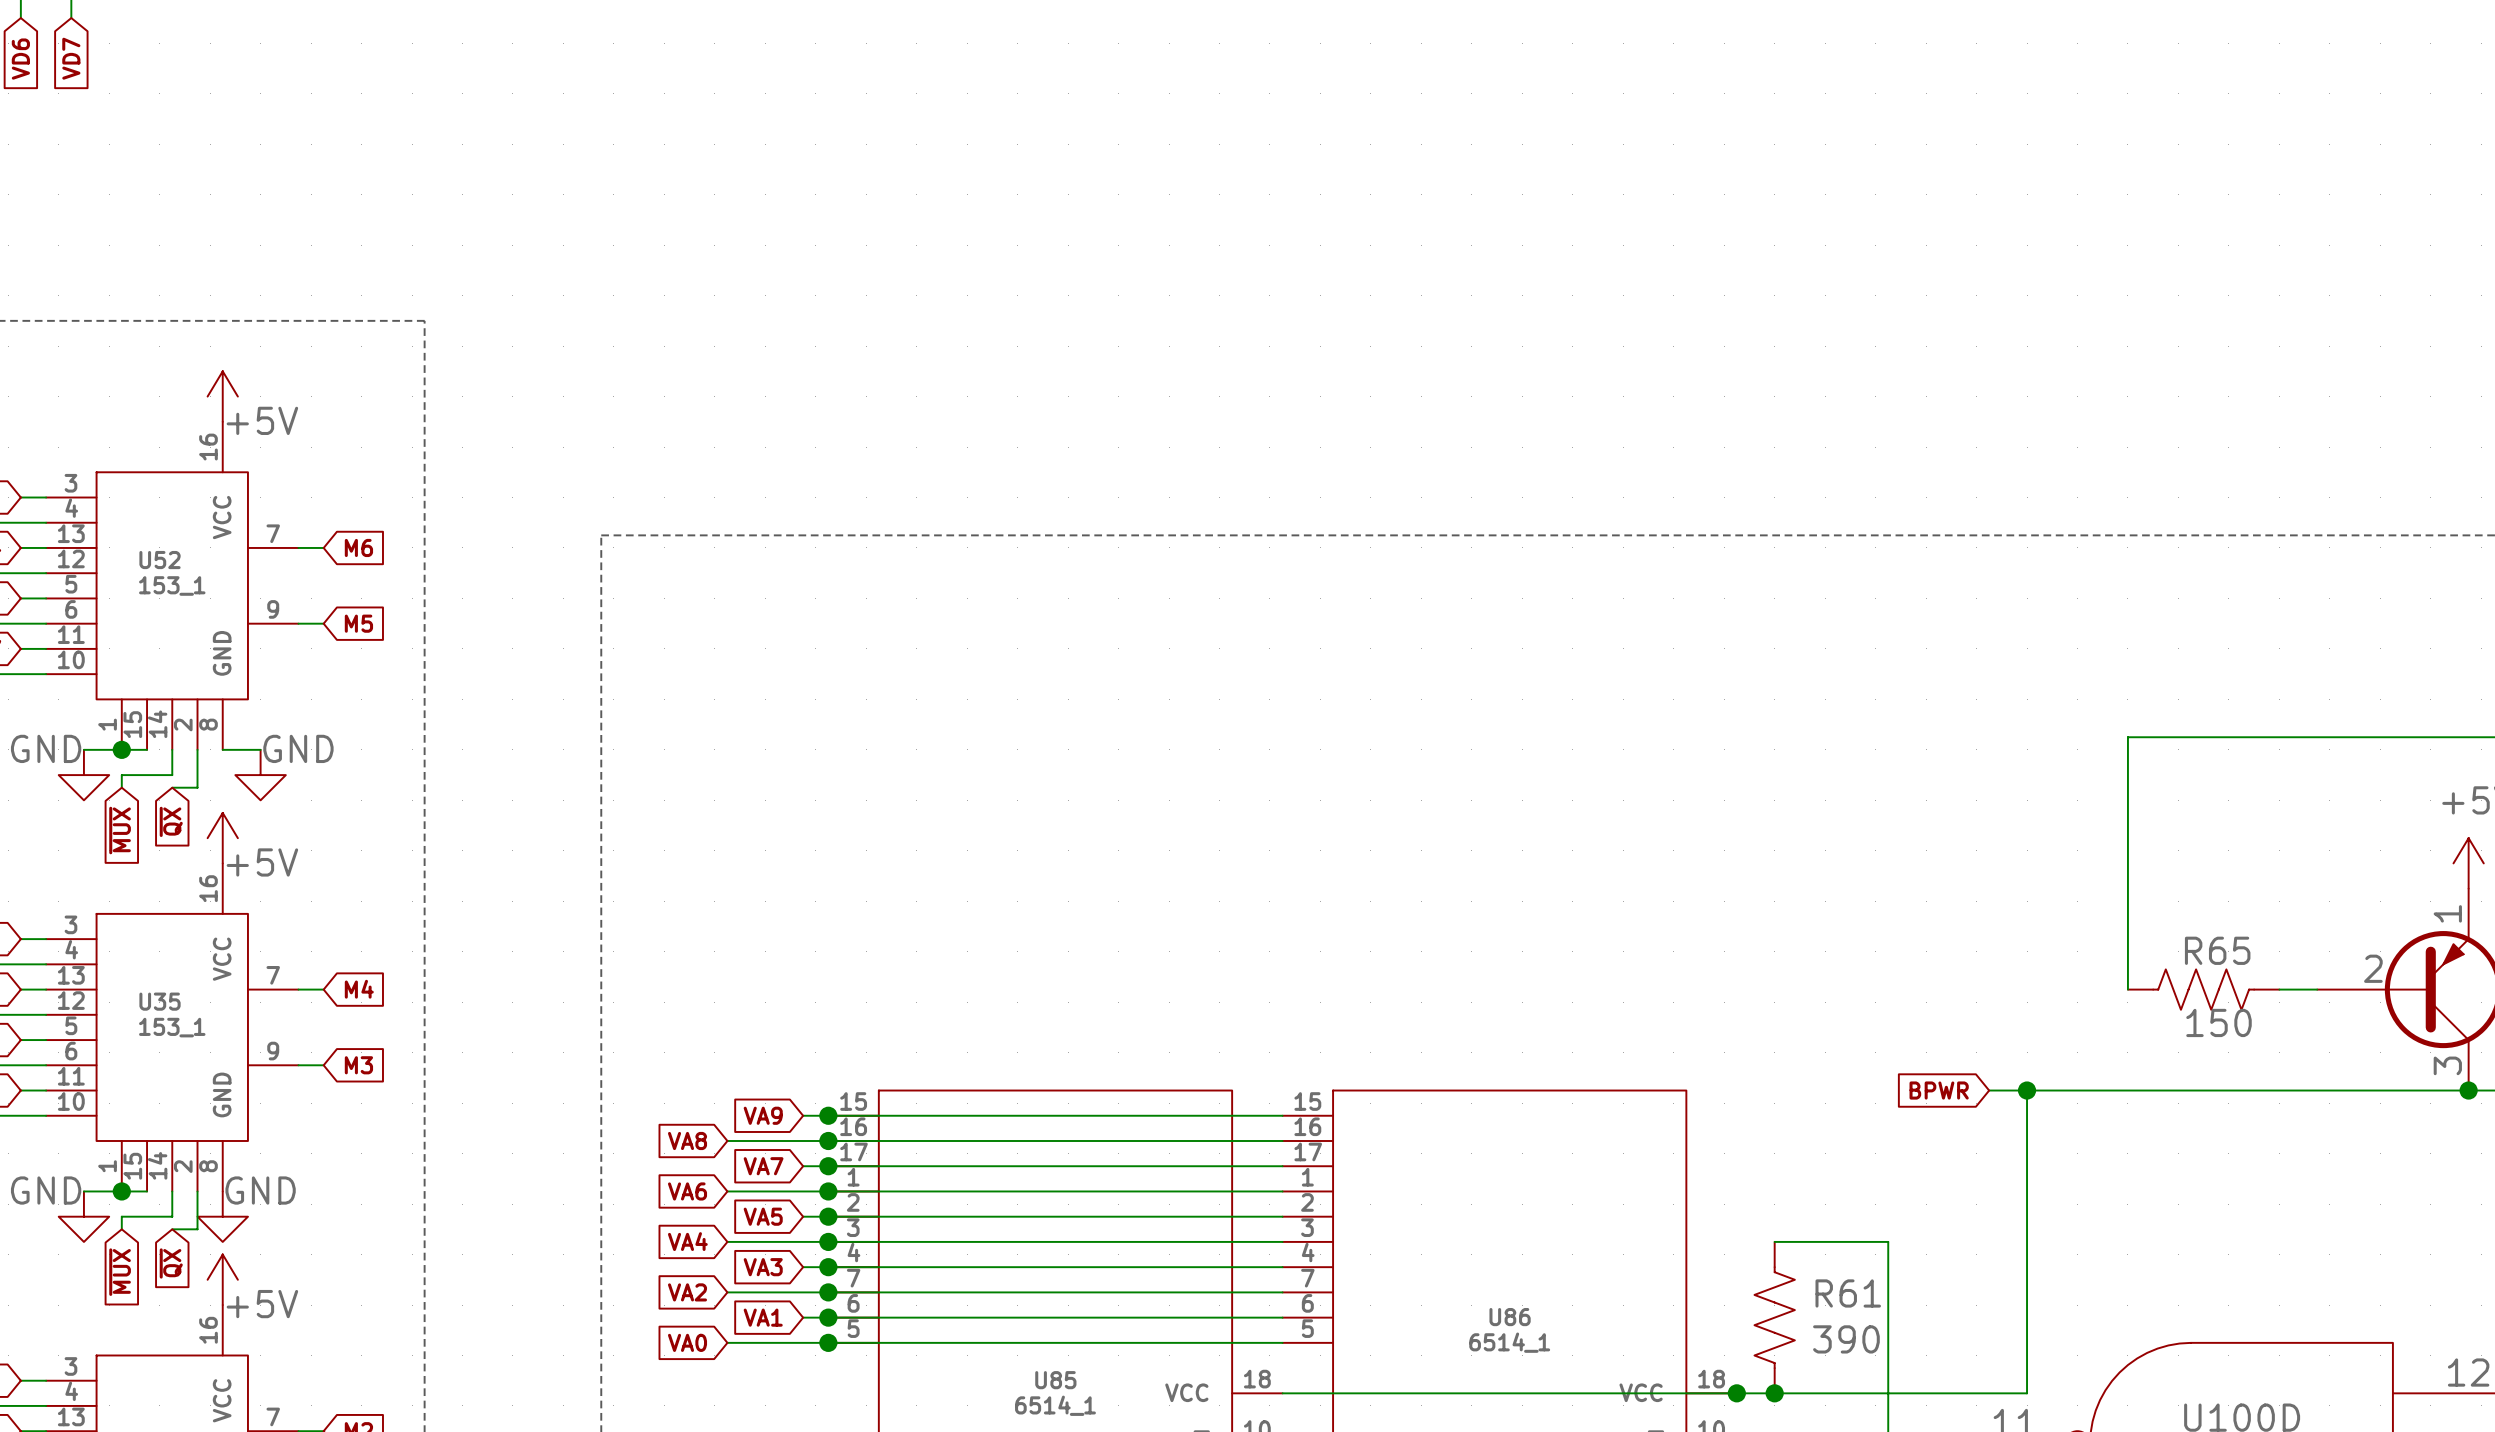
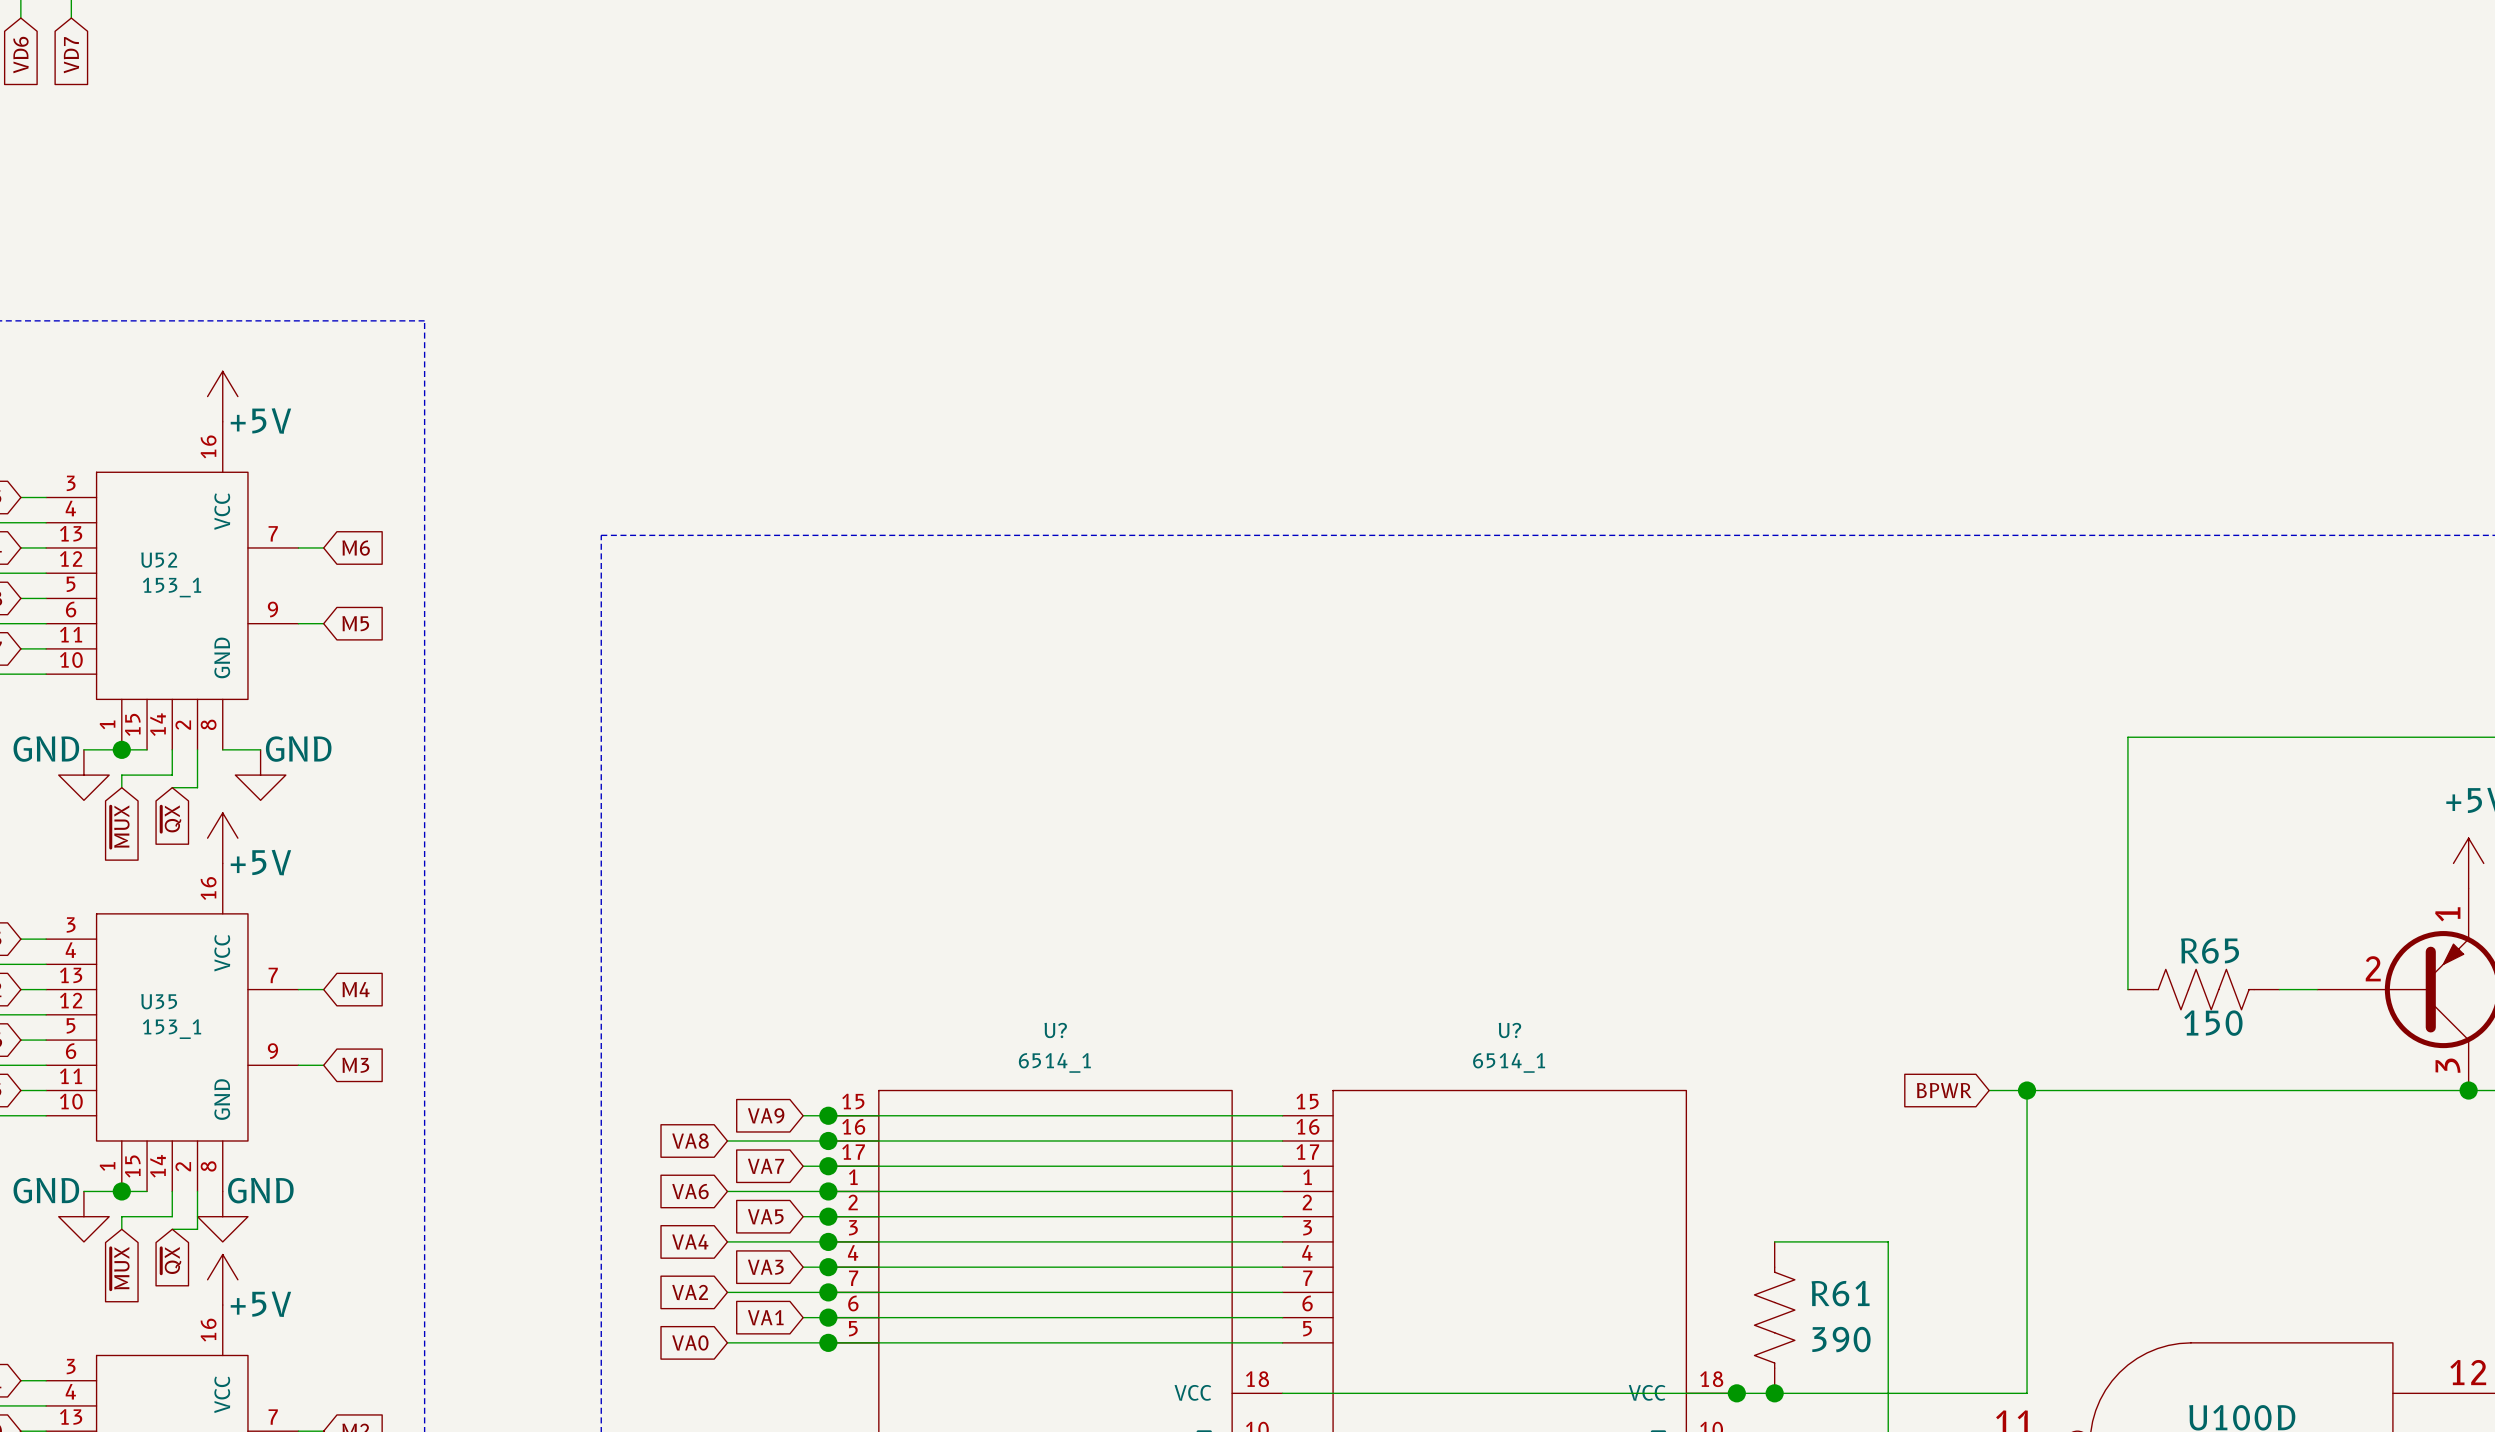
U86 name: U86 (1510, 1317) -> U? (1509, 1030)
U86 value position: 6514_1 (1509, 1342) -> 6514_1 (1509, 1062)
U85 name: U85 (1055, 1380) -> U? (1055, 1030)
U85 value position: 6514_1 (1055, 1405) -> 6514_1 (1054, 1062)

